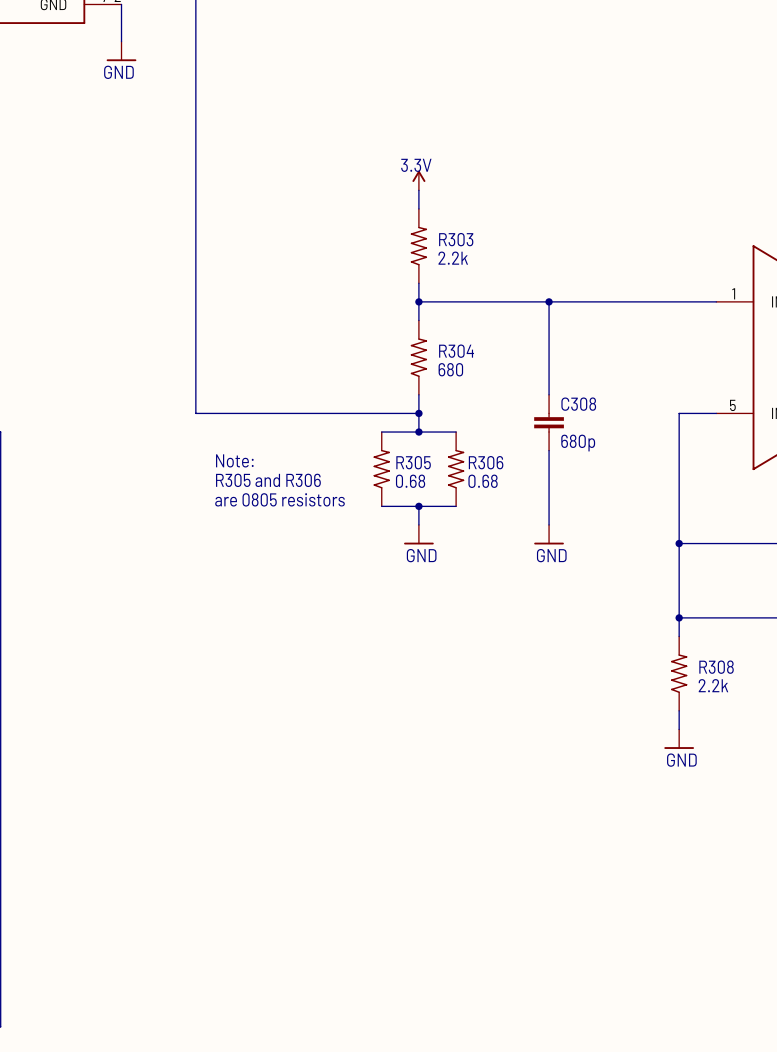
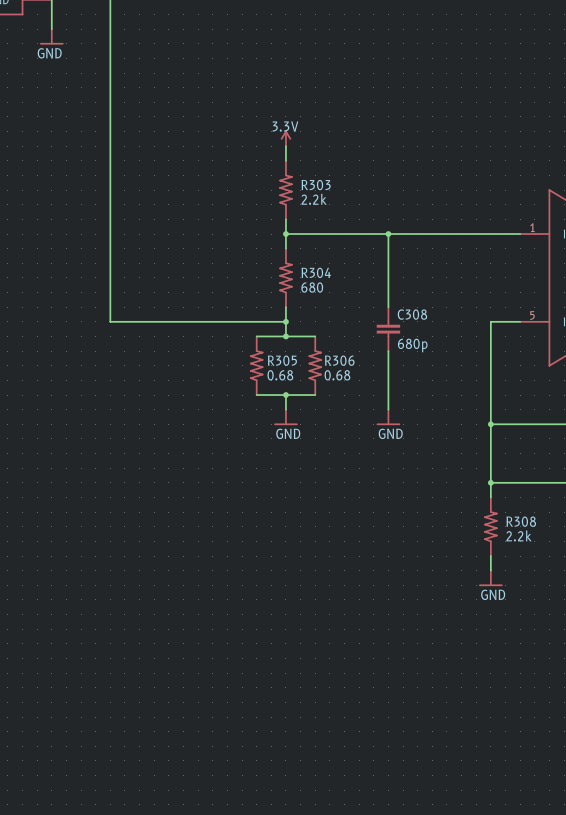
text: Note: (234, 460) -> none
text: R305 and R306 (268, 480) -> none
text: are 0805 resistors (280, 499) -> none

